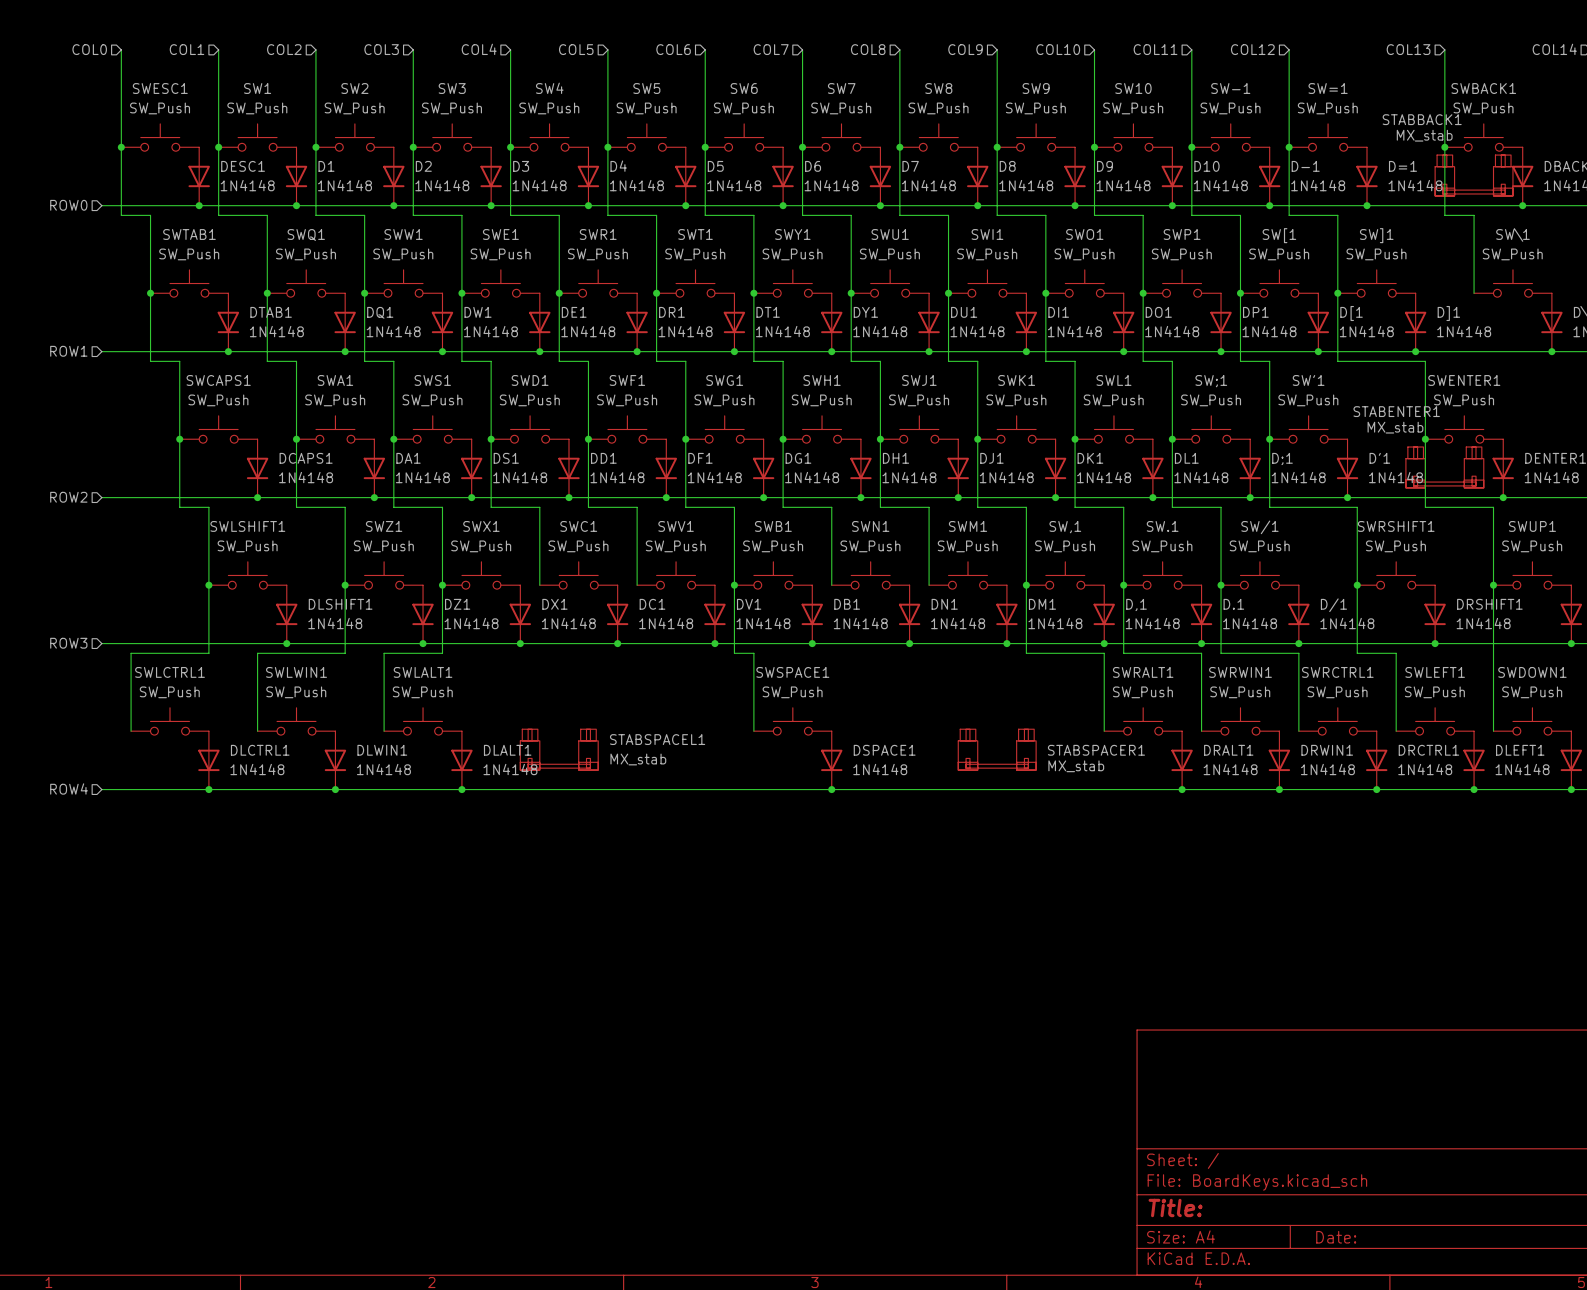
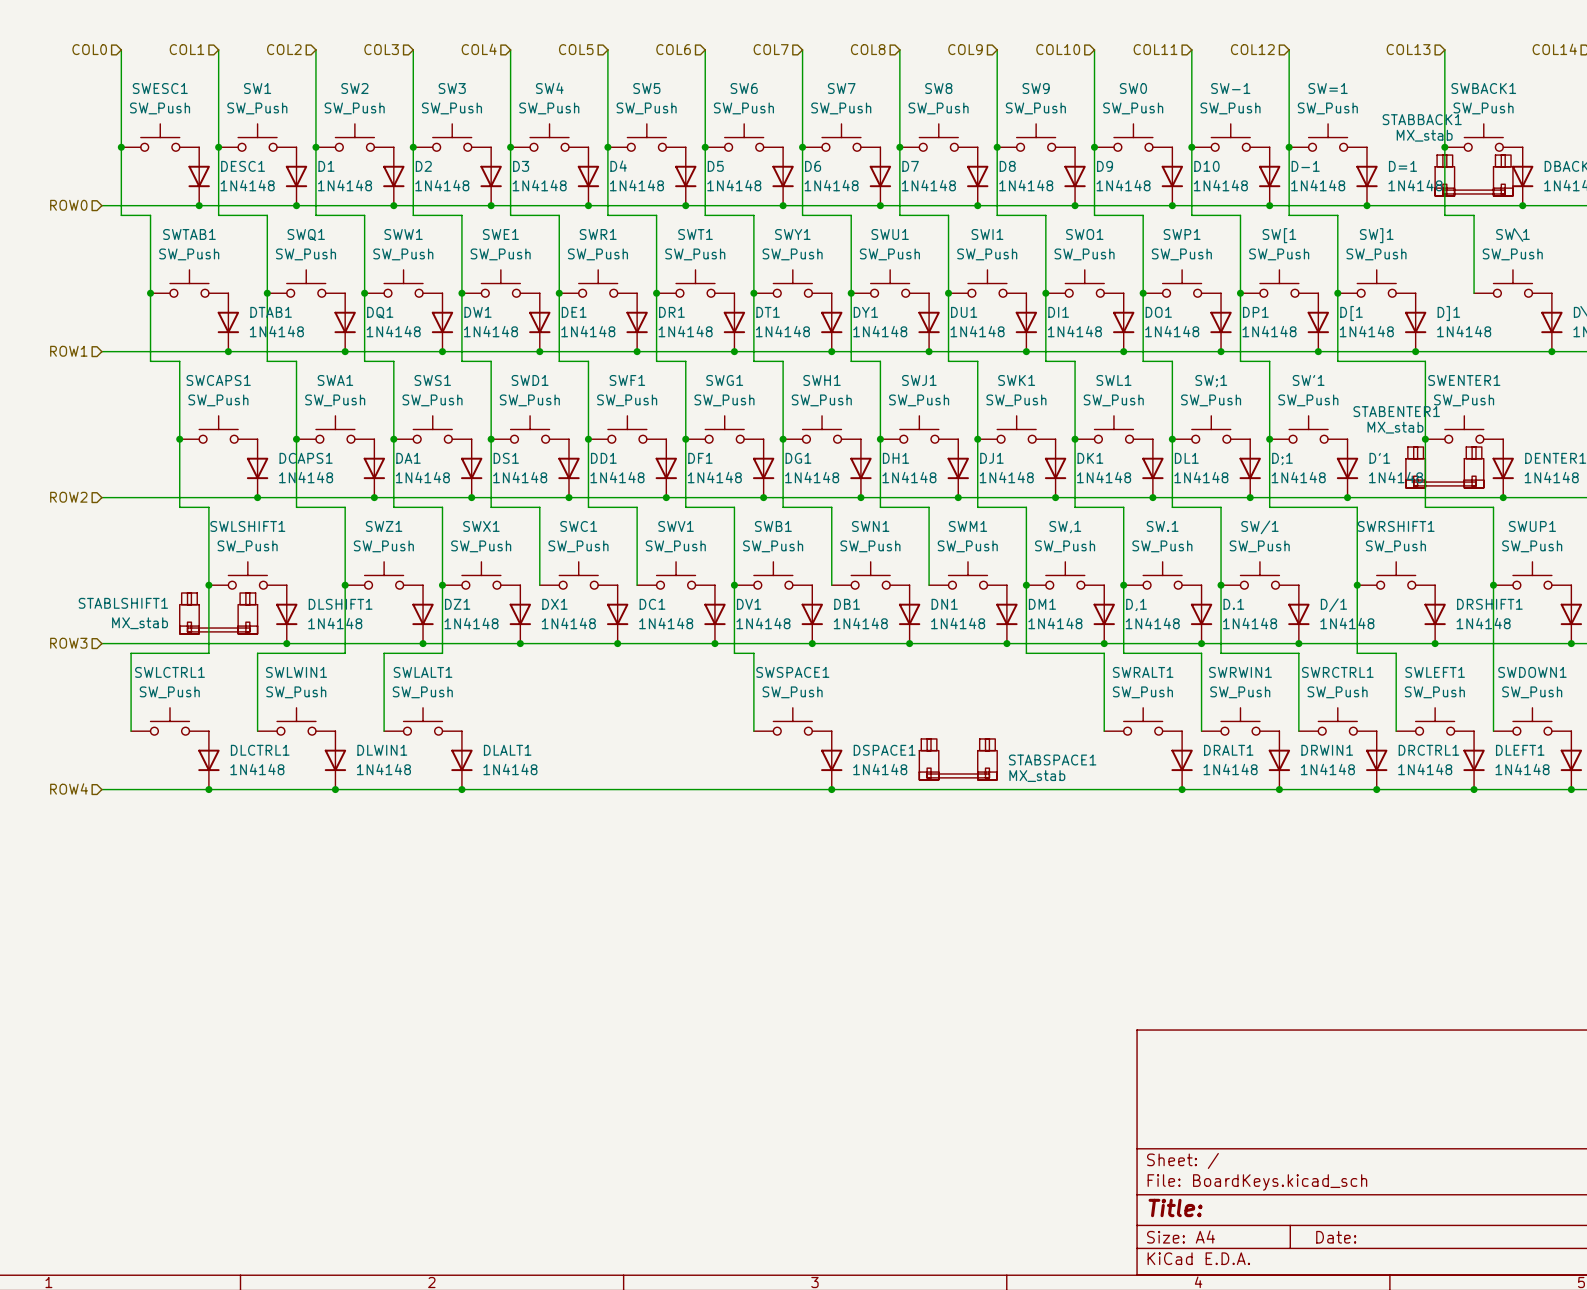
SW10 name: SW10 (1133, 88) -> SW0 (1133, 88)
STABLSHIFT1: none -> MX_stab (218, 613)
STABSPACEL1: MX_stab (559, 749) -> none
STABSPACER1: MX_stab (997, 749) -> none
STABSPACE1: none -> MX_stab (958, 759)

